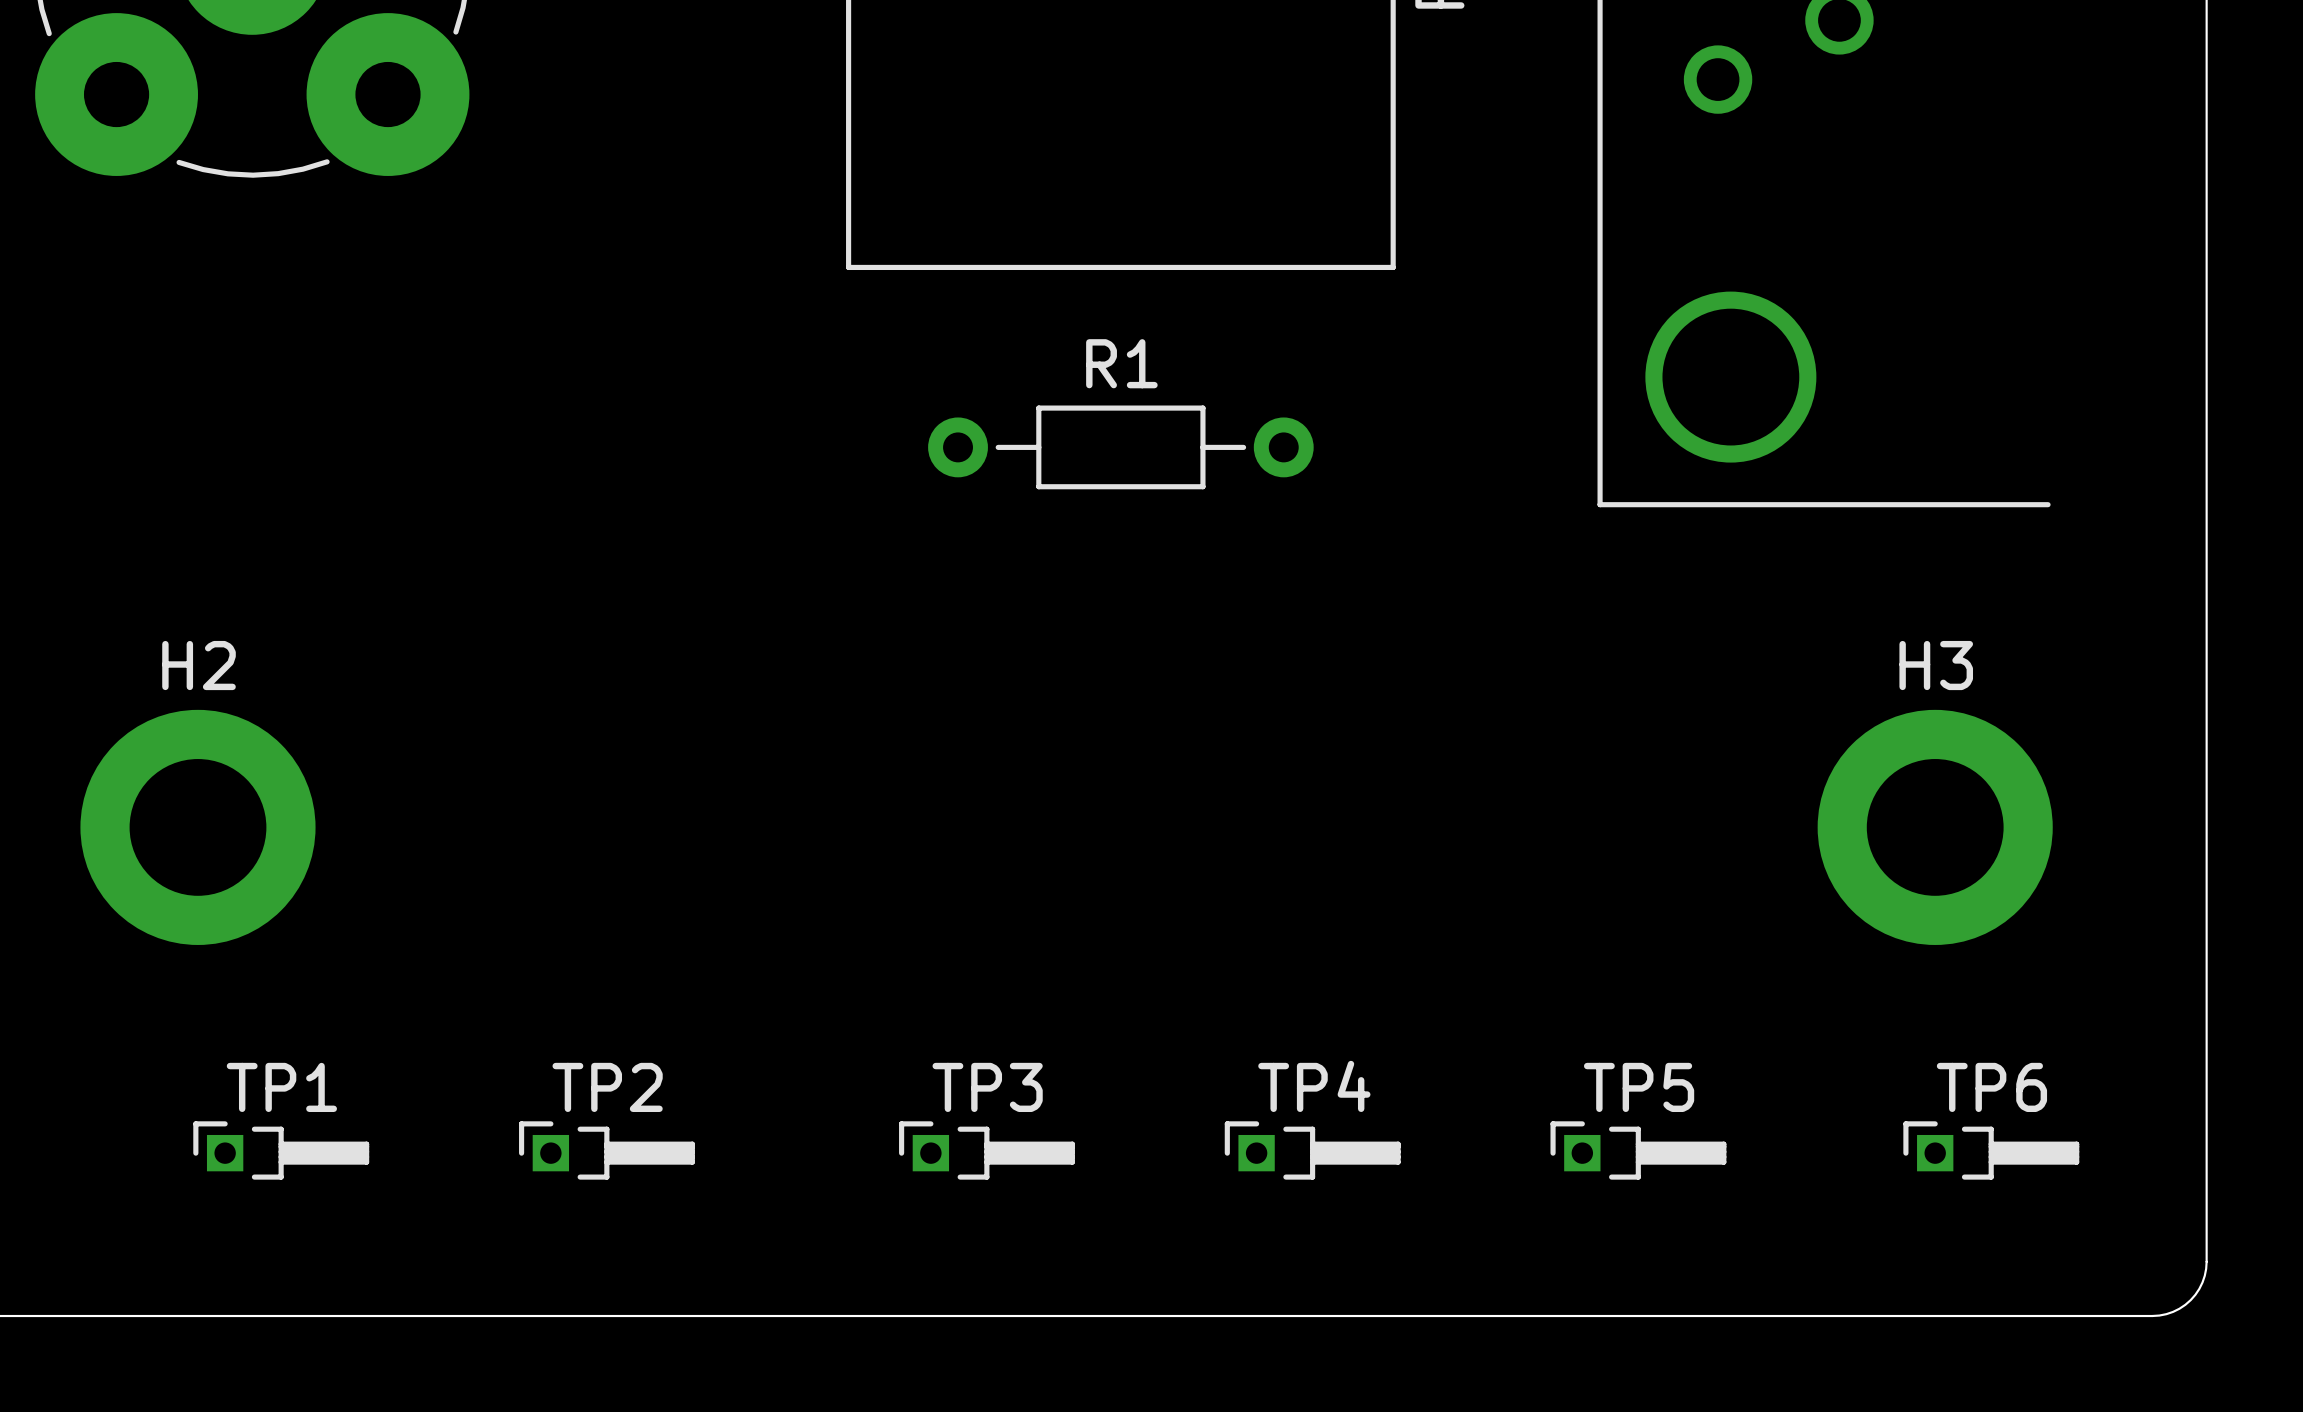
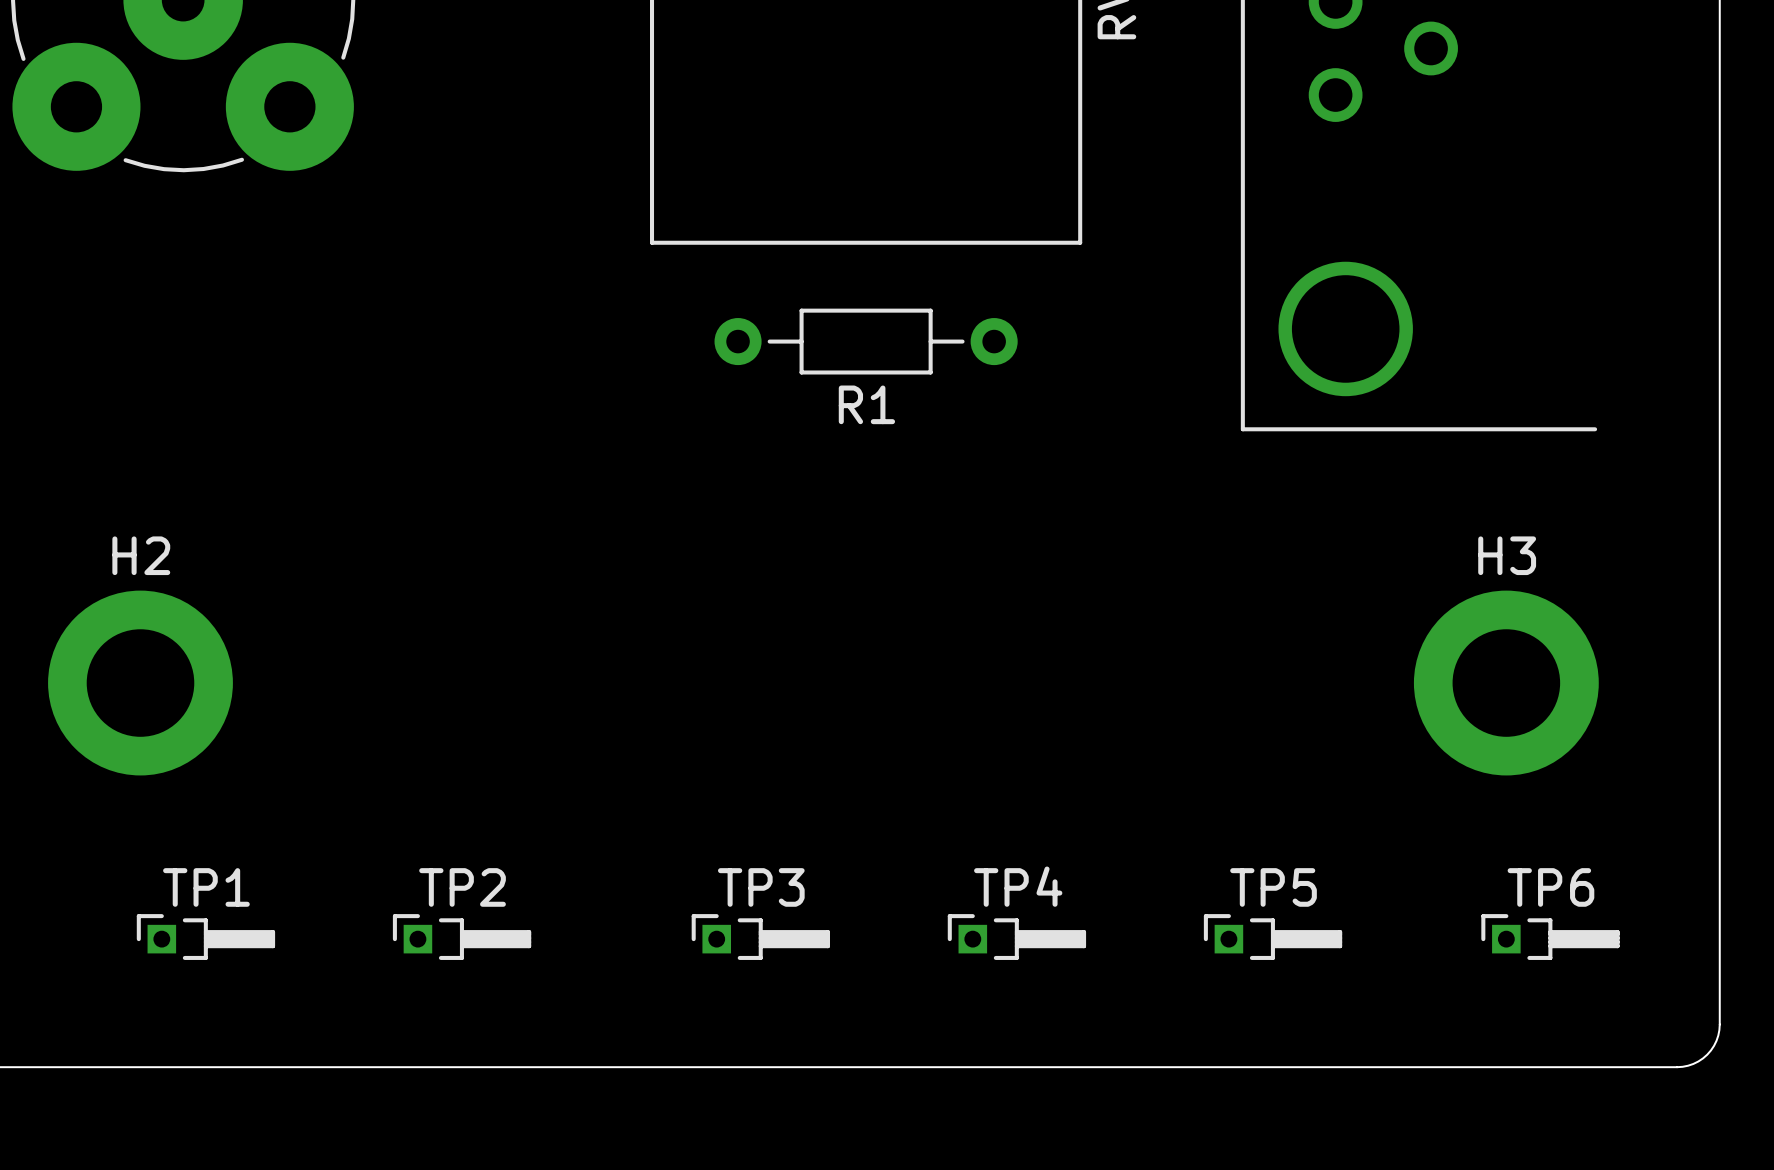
R1 name position: R1 (1121, 363) -> R1 (866, 404)
R1 position: (1120, 447) -> (866, 341)

